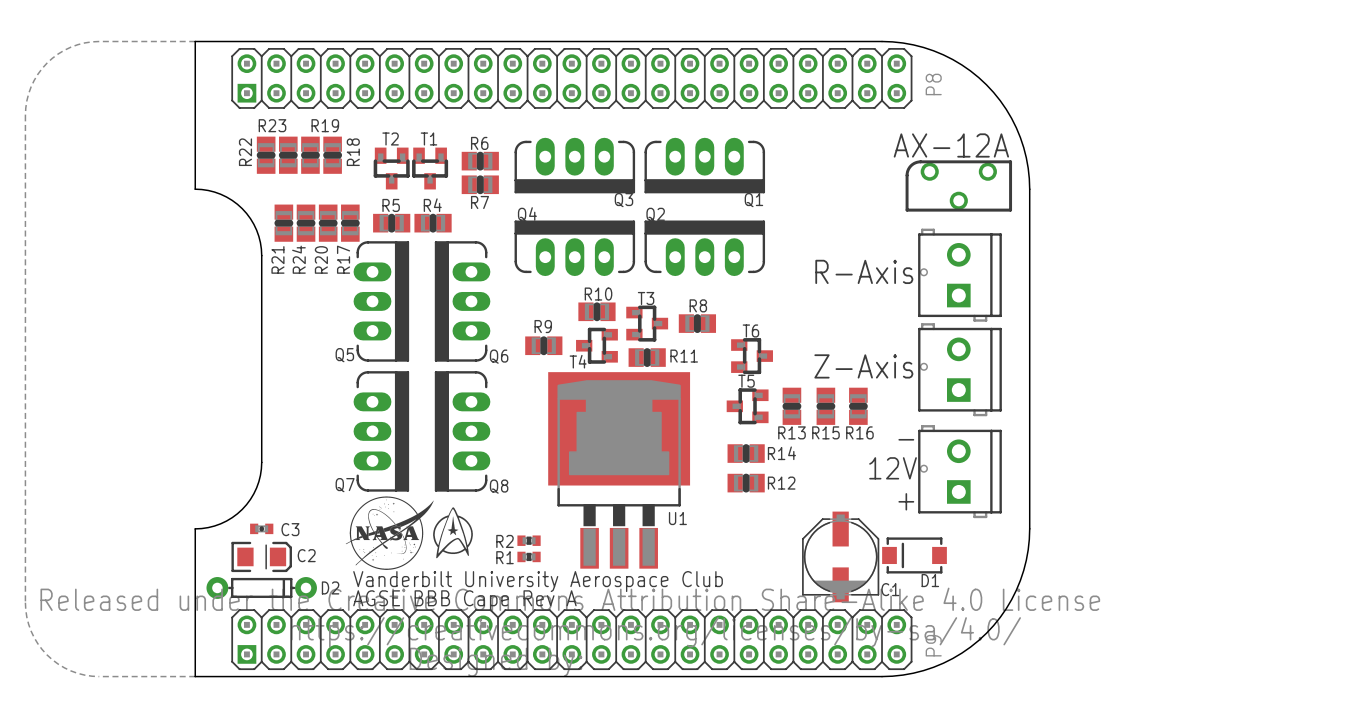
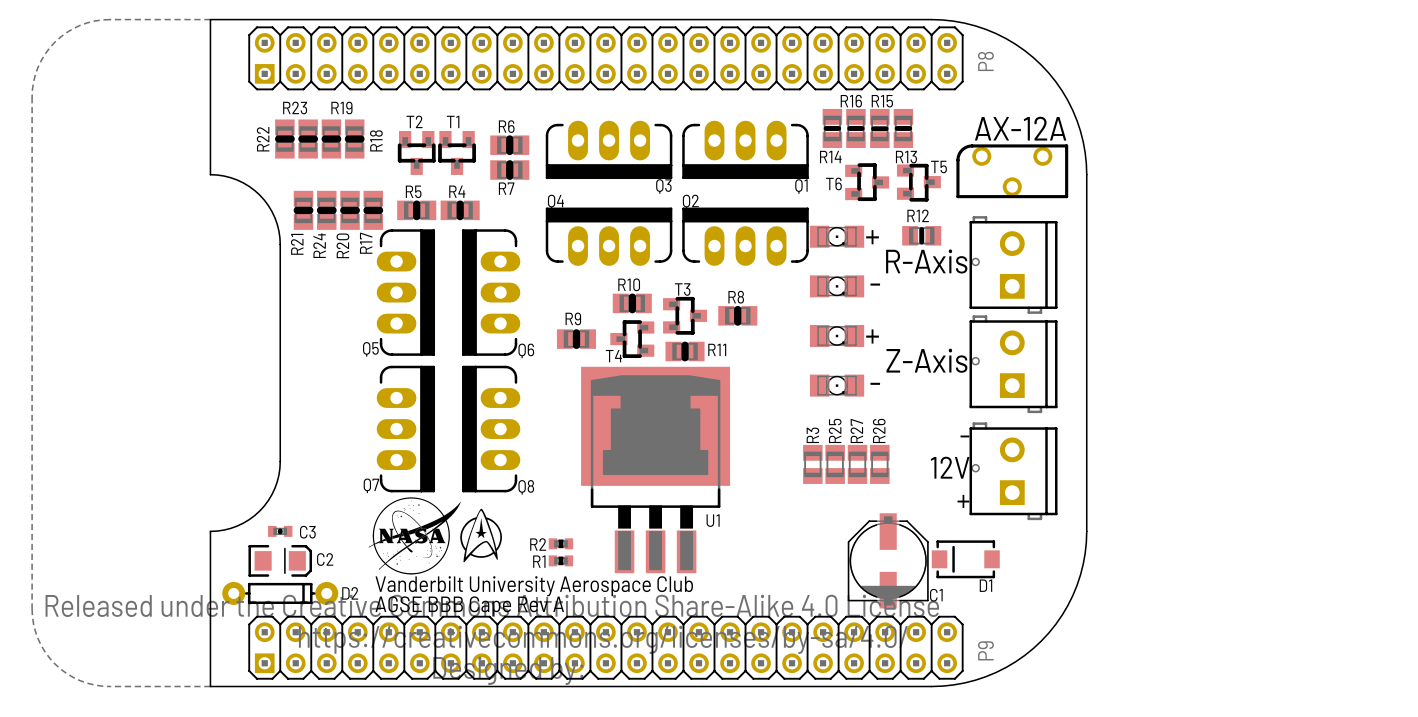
line: none -> (849, 128) (862, 128)
line: none -> (859, 165) (874, 165) (874, 177)
line: none -> (874, 186) (874, 199) (859, 199)
part: none -> (837, 236)
text: none -> + (872, 237)
part: none -> (837, 286)
text: none -> - (875, 284)
T6 name position: T6 (750, 330) -> T6 (833, 183)
line: (744, 339) (759, 339) (759, 351) -> (911, 165) (926, 165) (926, 178)
part: none -> (837, 335)
text: none -> + (872, 336)
line: (744, 348) (744, 361) -> (910, 174) (910, 188)
T6 position: (752, 356) -> (867, 182)
line: (759, 359) (759, 372) (744, 372) -> (926, 185) (926, 199) (911, 199)
T5 name position: T5 (746, 381) -> T5 (938, 166)
text: none -> - (875, 383)
line: (755, 390) (740, 390) (740, 401) -> none
part: none -> (837, 385)
line: (755, 398) (755, 413) -> (859, 173) (859, 188)
T5 rotation: 0° (747, 406) -> 180° (918, 182)
T5 position: (747, 406) -> (918, 182)
line: (786, 406) (797, 406) -> (826, 128) (838, 128)
R13 position: (791, 406) -> (903, 128)
line: (819, 406) (831, 406) -> (873, 128) (886, 128)
R15 position: (825, 406) -> (879, 128)
line: (852, 406) (864, 406) -> (897, 128) (909, 128)
R16 position: (858, 406) -> (855, 128)
line: (740, 410) (740, 422) (755, 422) -> none
R13 name position: R13 (791, 432) -> R13 (906, 157)
R15 name position: R15 (825, 432) -> R15 (882, 101)
R16 name position: R16 (859, 432) -> R16 (851, 101)
line: (746, 447) (746, 459) -> (921, 229) (921, 242)
R14 rotation: 0° (746, 453) -> 90° clockwise (832, 128)
R14 position: (746, 453) -> (832, 128)
R3: none -> (812, 464)
R25: none -> (835, 464)
R27: none -> (857, 464)
R26: none -> (879, 464)
line: (746, 477) (746, 489) -> none
R12 position: (746, 483) -> (921, 235)
R12 name position: R12 (781, 483) -> R12 (918, 215)

